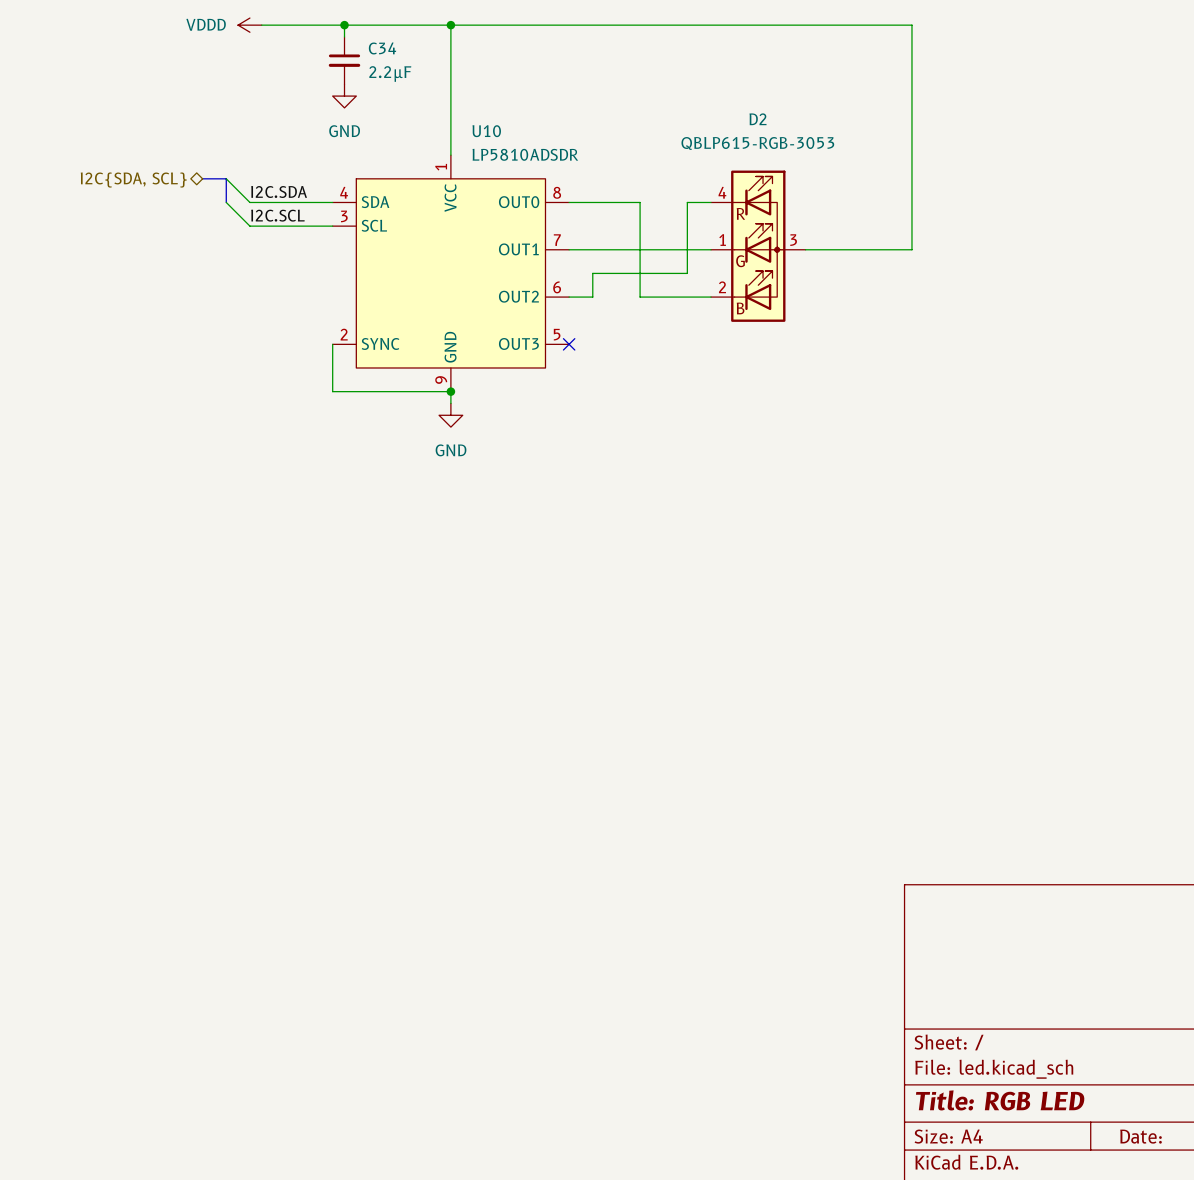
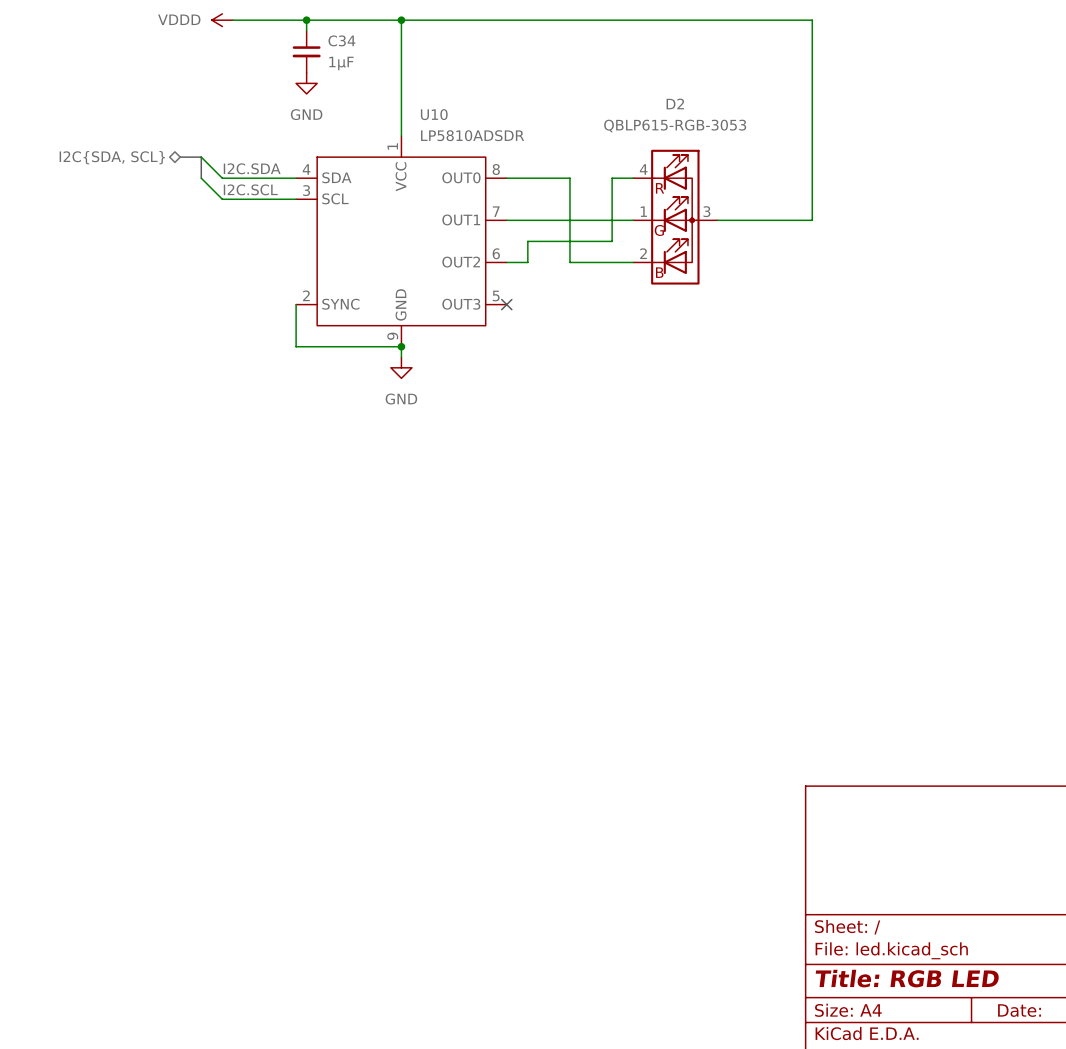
C34 value: 2.2µF (390, 74) -> 1µF (341, 63)

